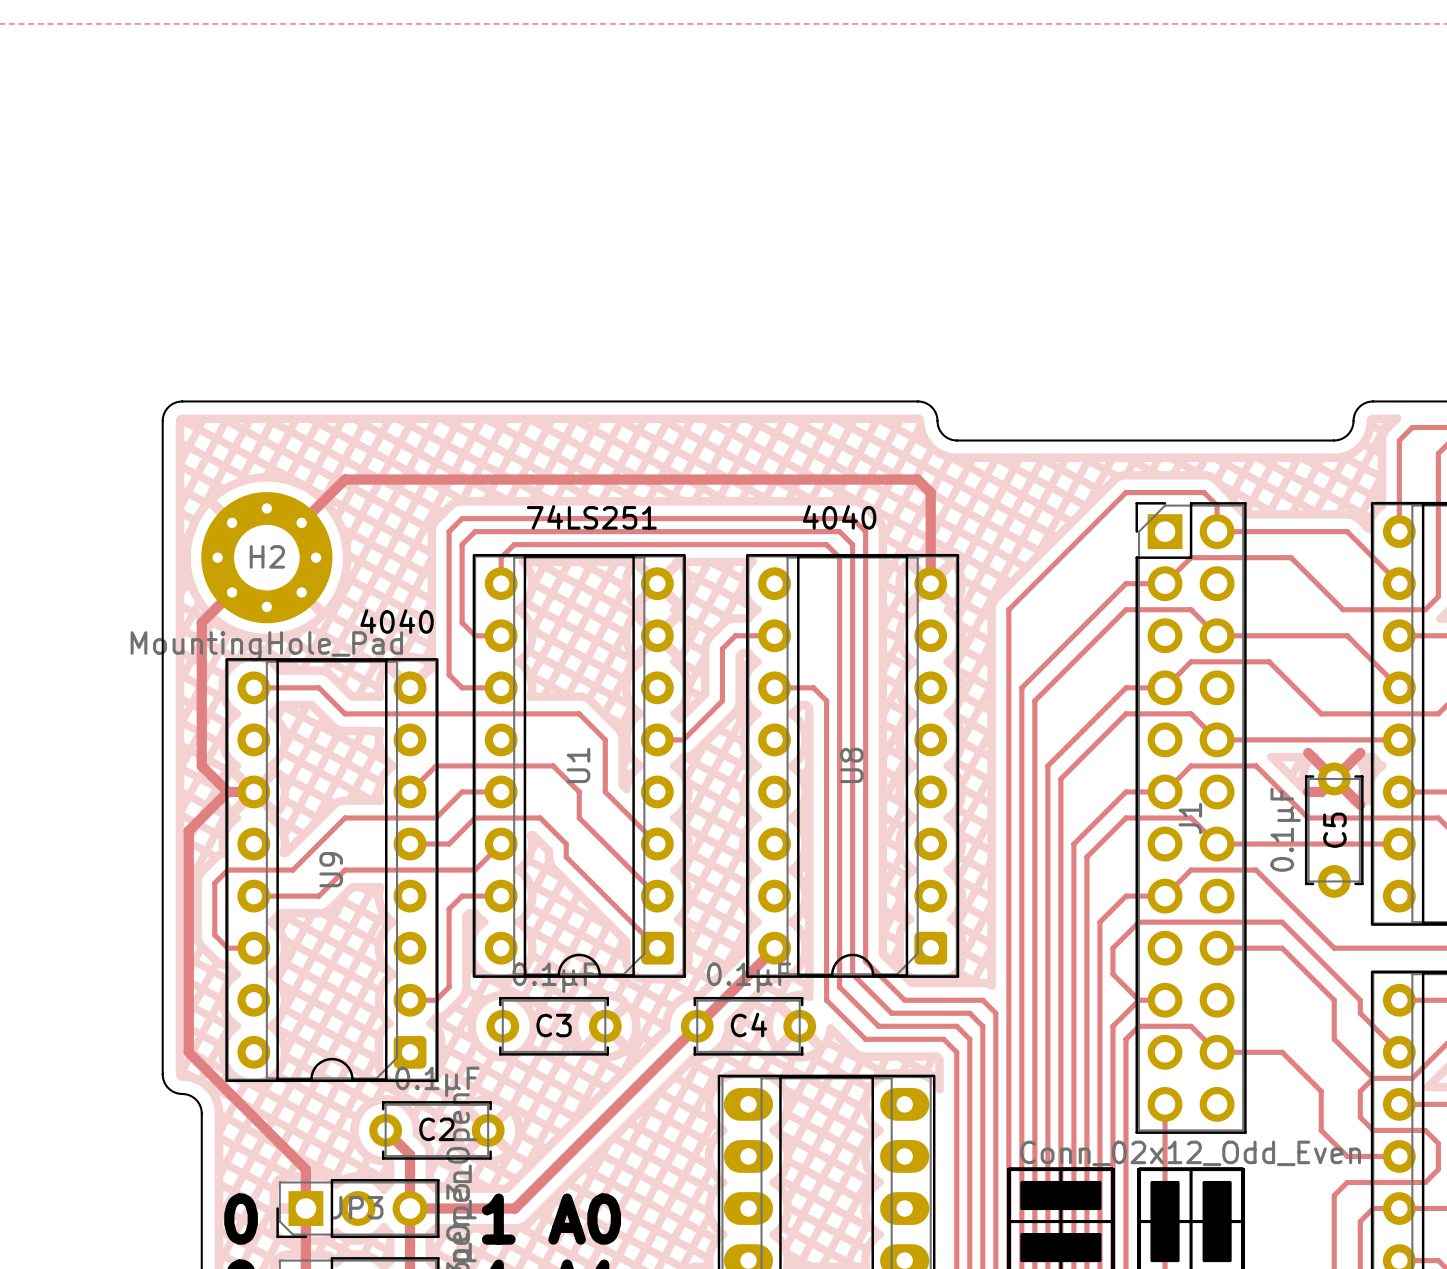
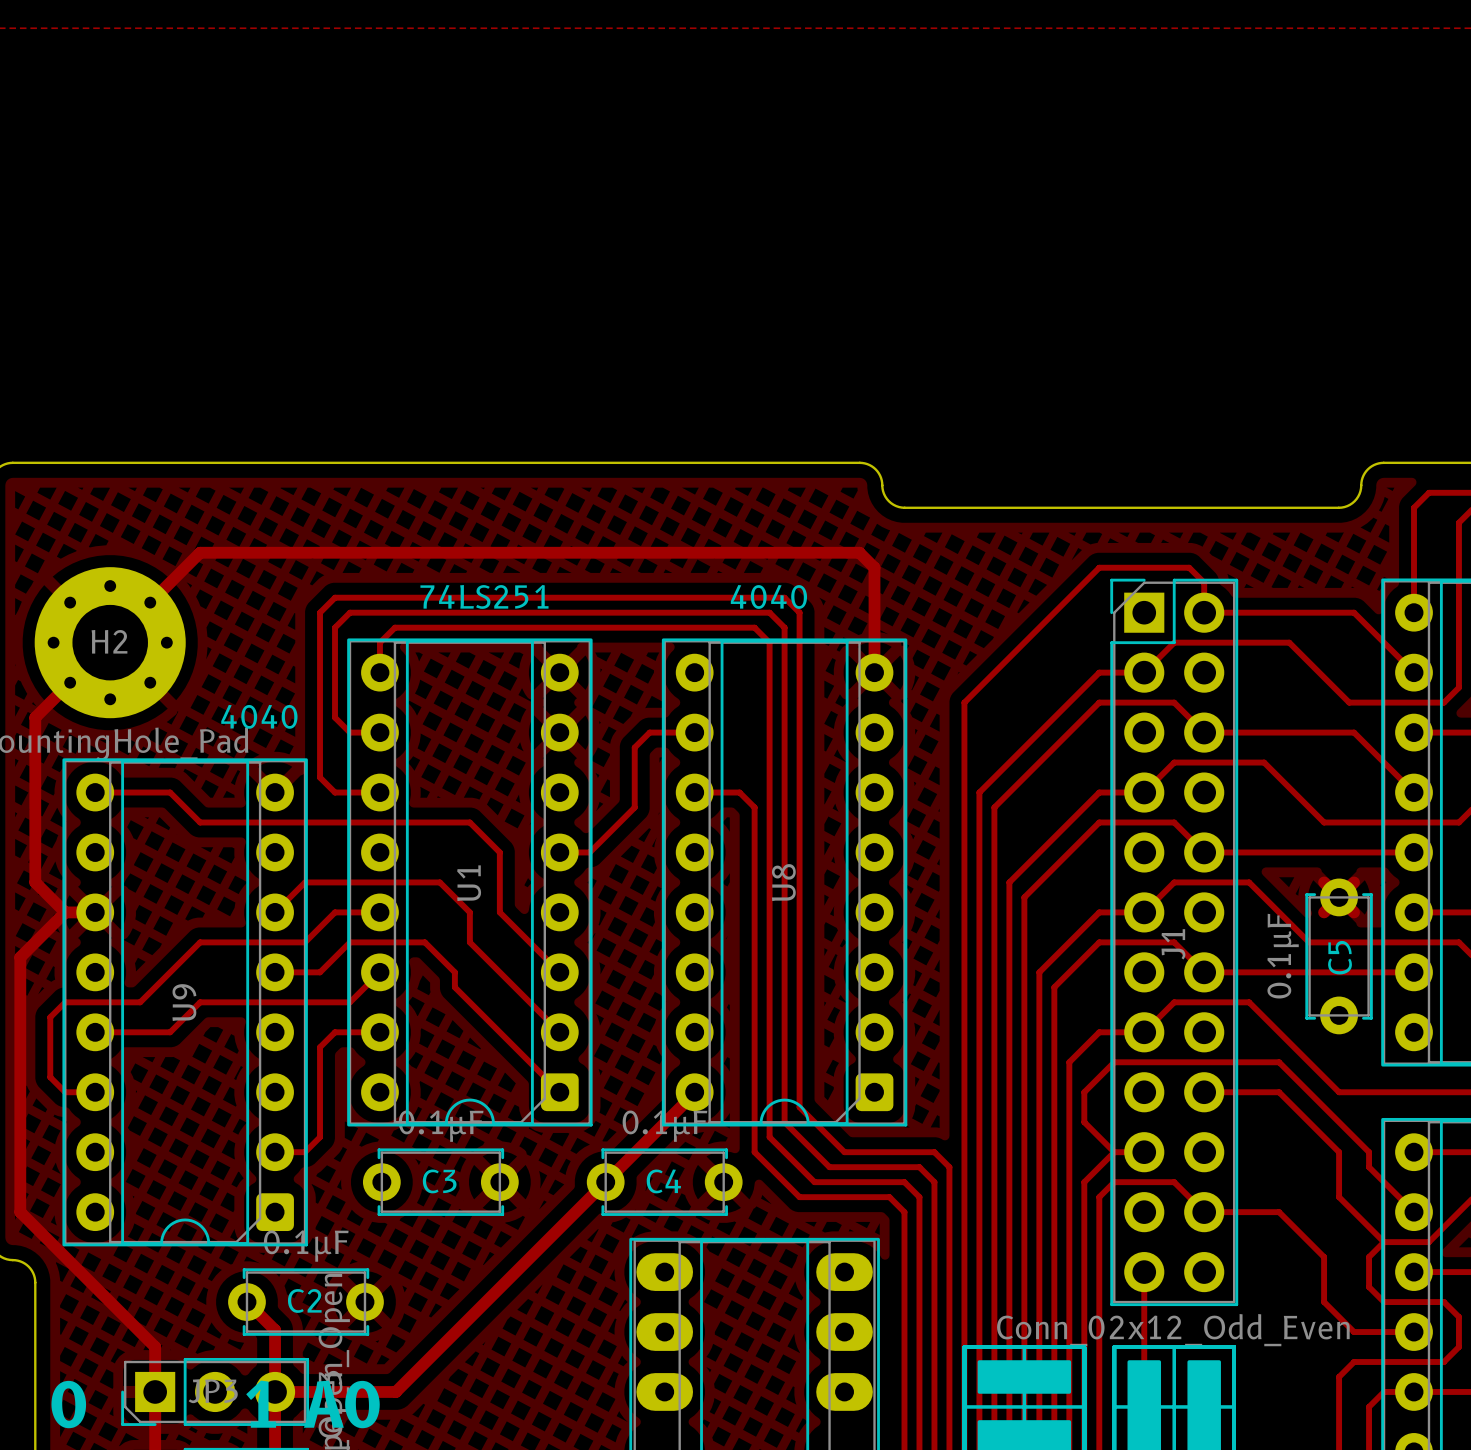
track: (1308, 752) (1321, 765) -> none
track: (1360, 752) (1347, 765) -> none
track: (1308, 791) (1321, 791) -> none
track: (1347, 791) (1360, 804) -> none

